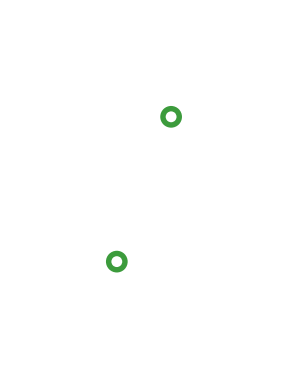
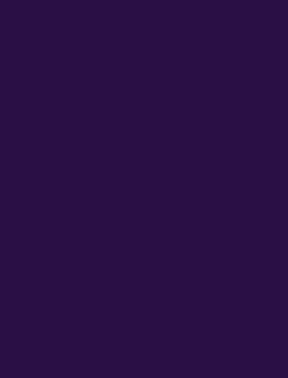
via: (171, 116) -> none
via: (116, 261) -> none

